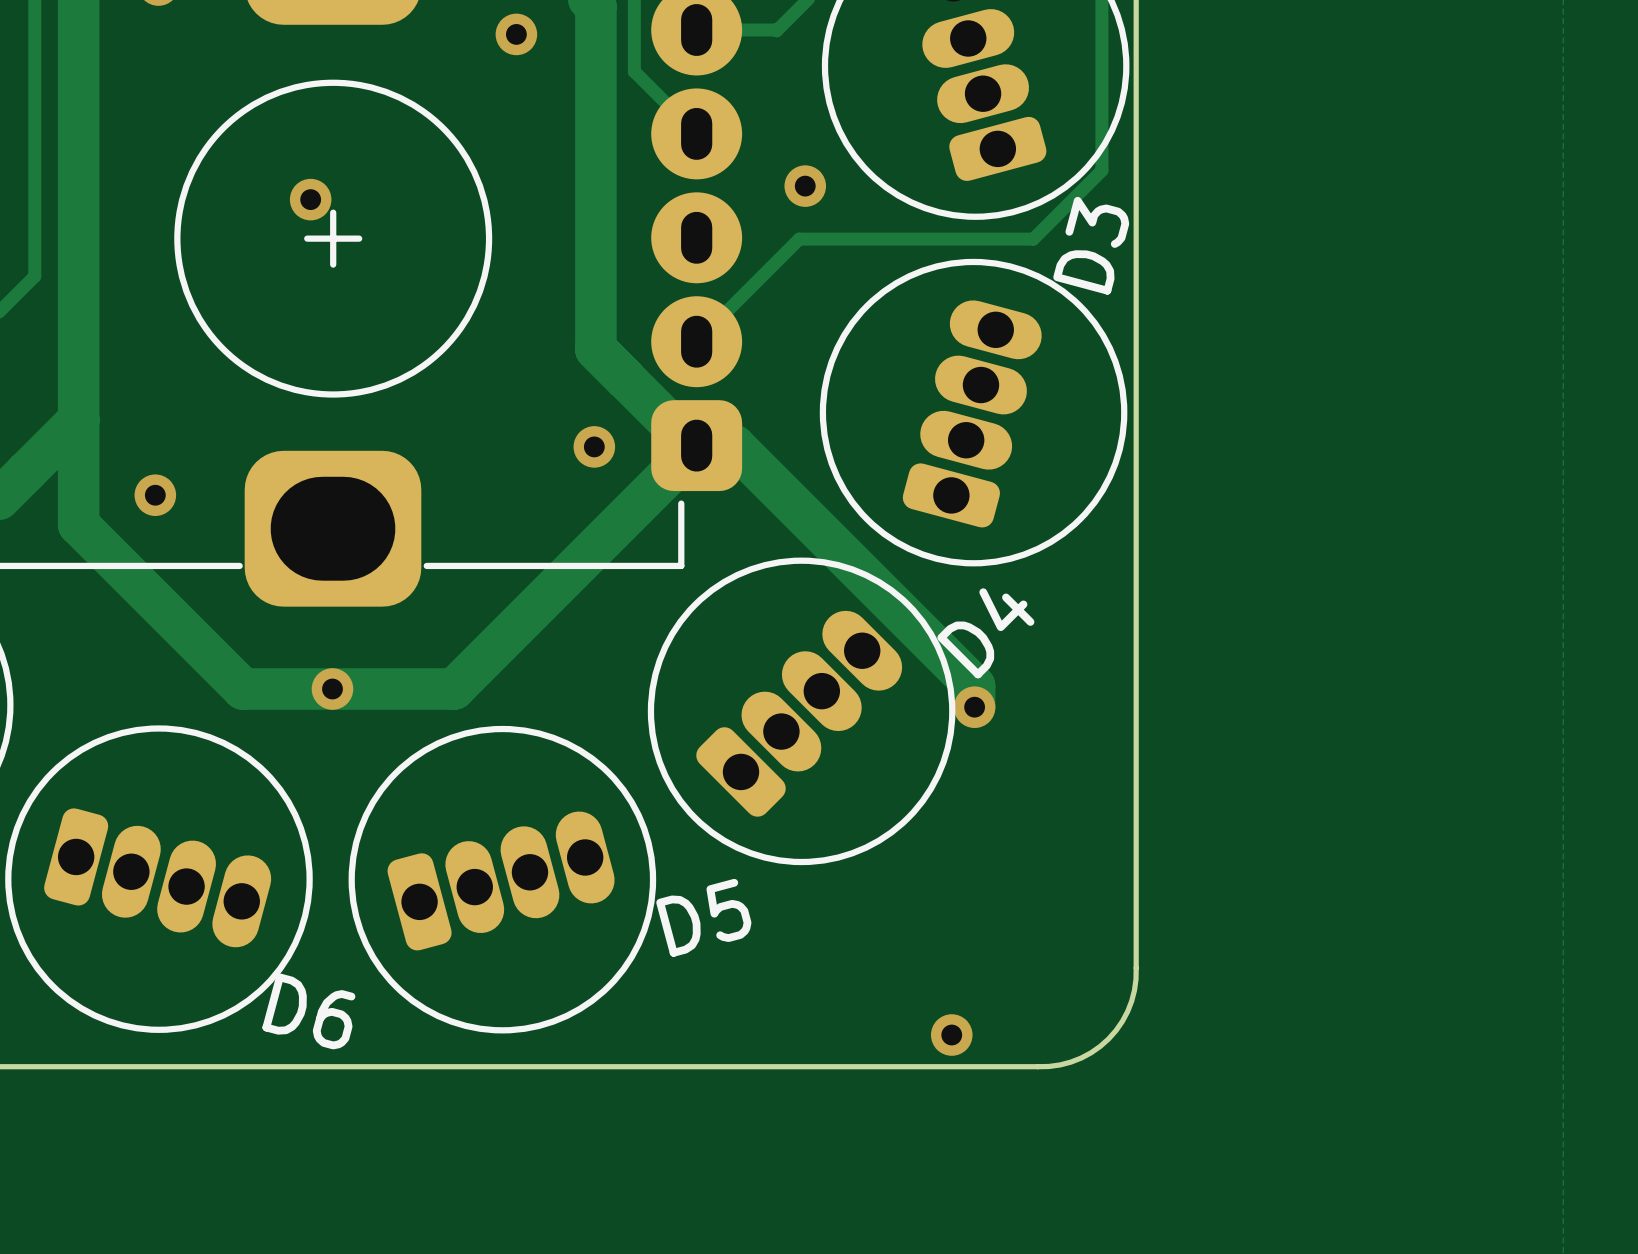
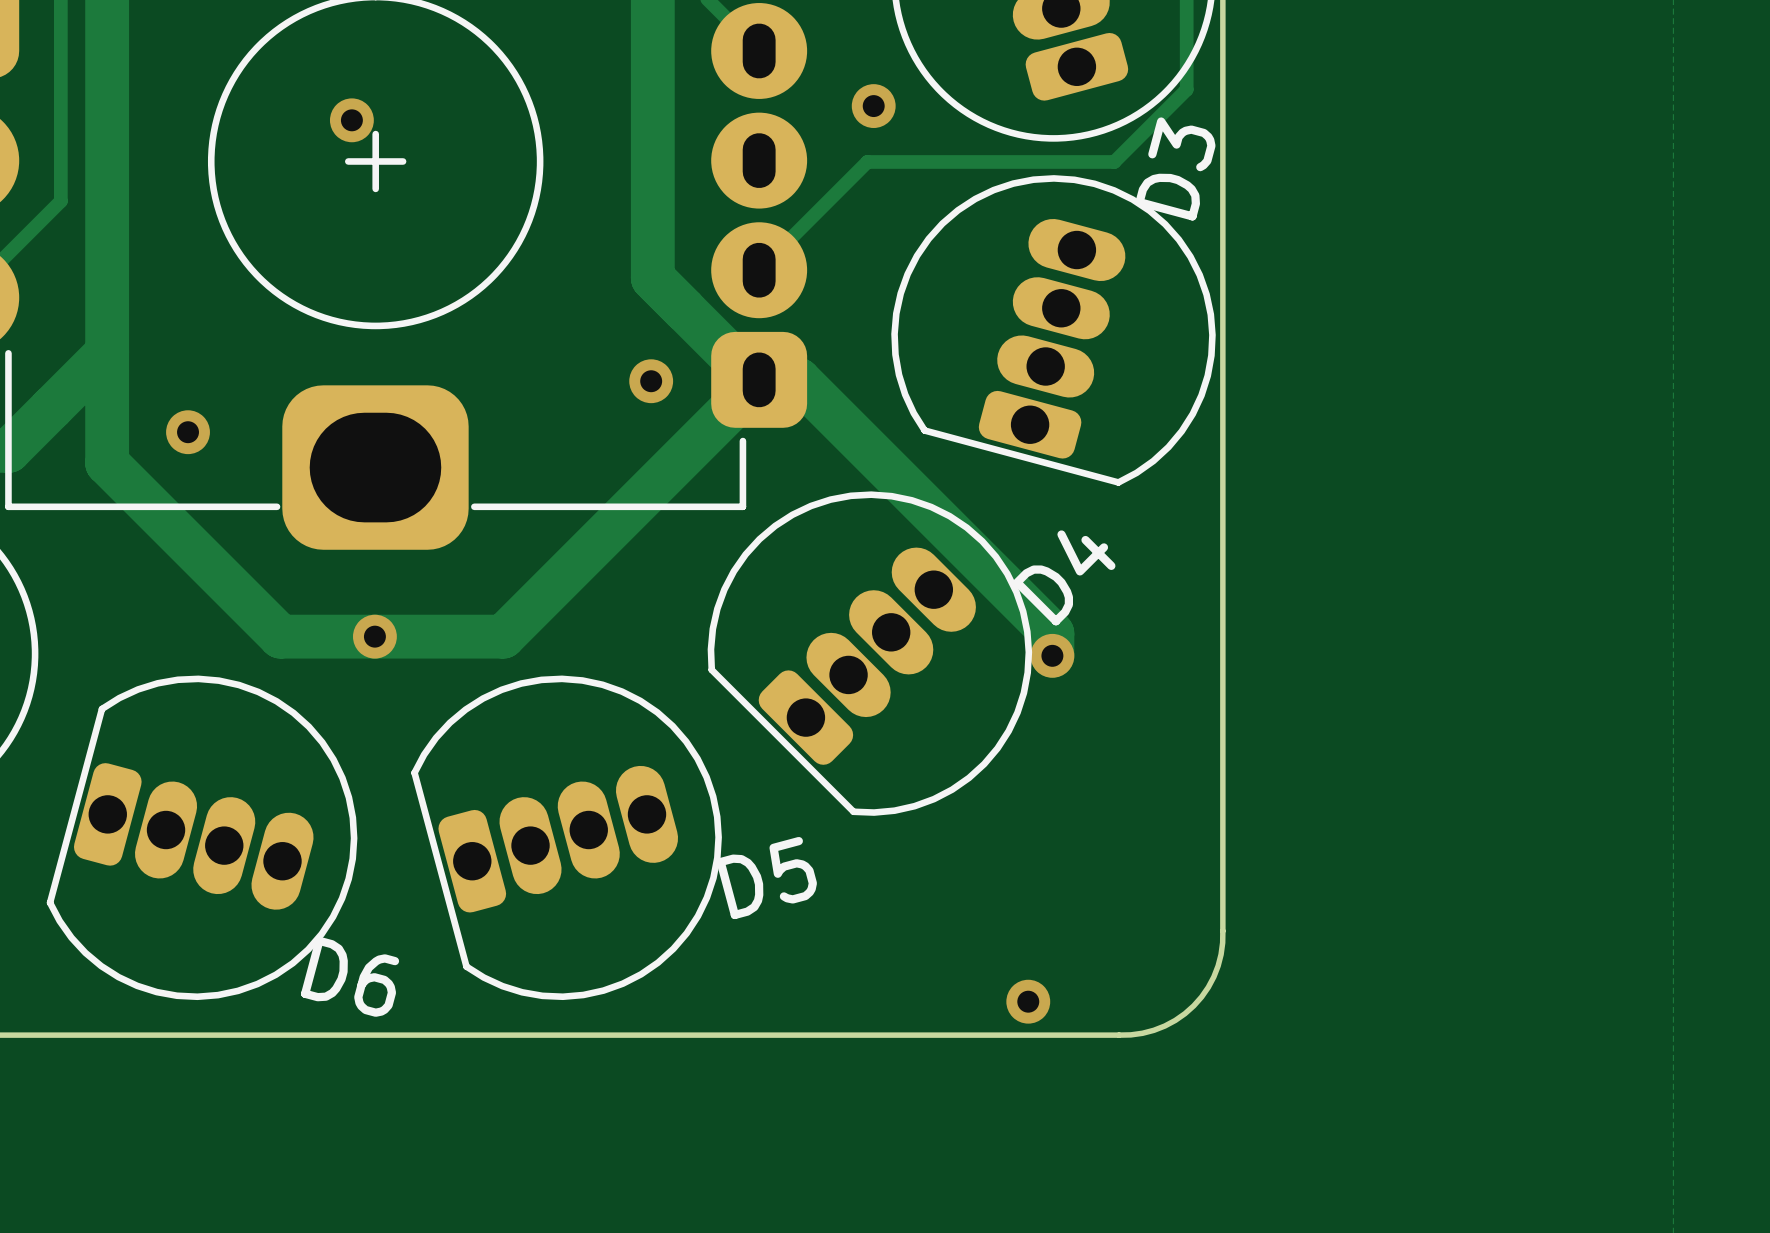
D3 footprint: [819, 258, 1128, 567] -> [891, 175, 1216, 486]
D4 footprint: [647, 557, 956, 866] -> [707, 491, 1033, 816]
D6 footprint: [5, 725, 313, 1033] -> [46, 675, 358, 1001]
D5 footprint: [348, 725, 657, 1034] -> [411, 675, 722, 1001]

